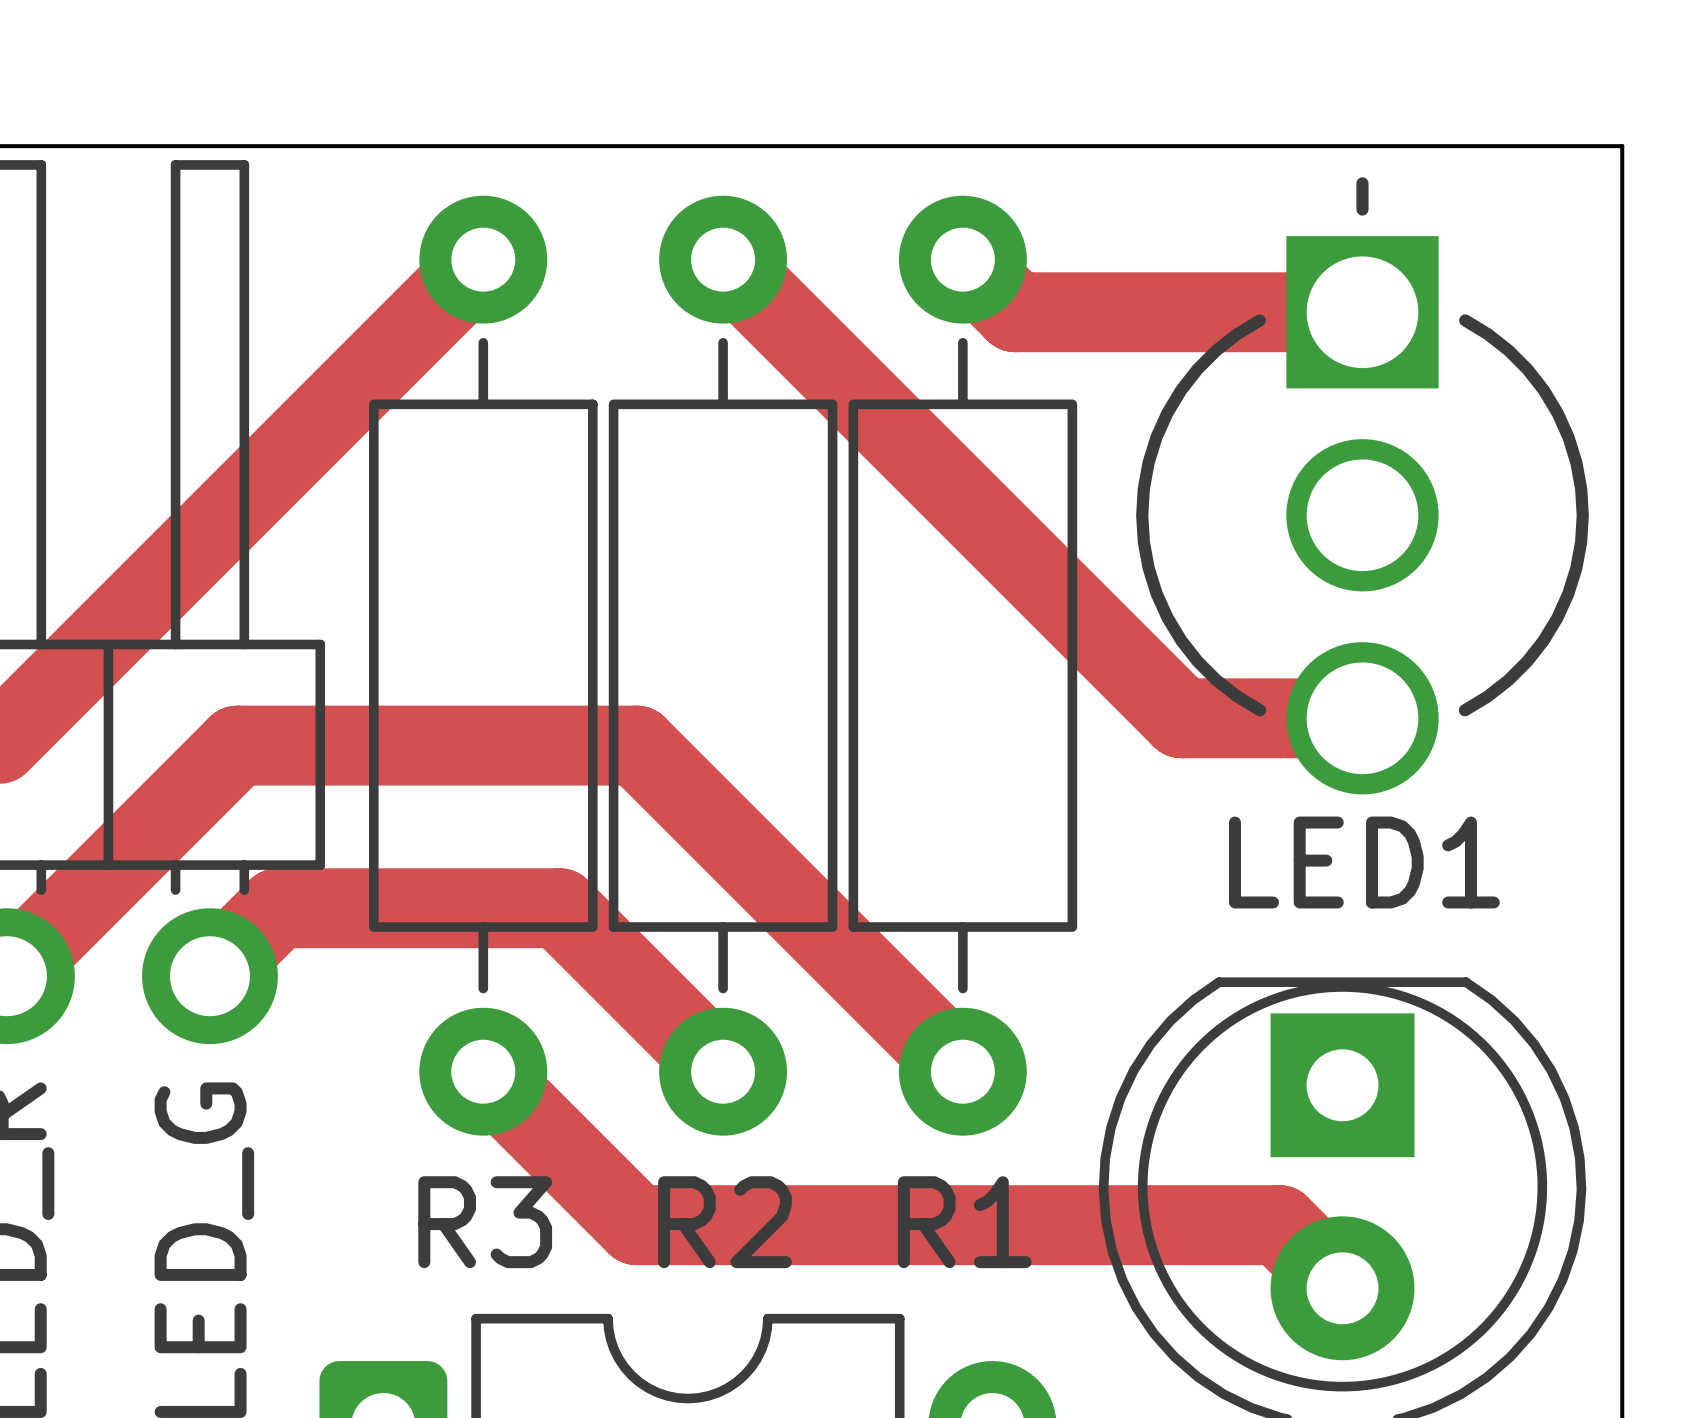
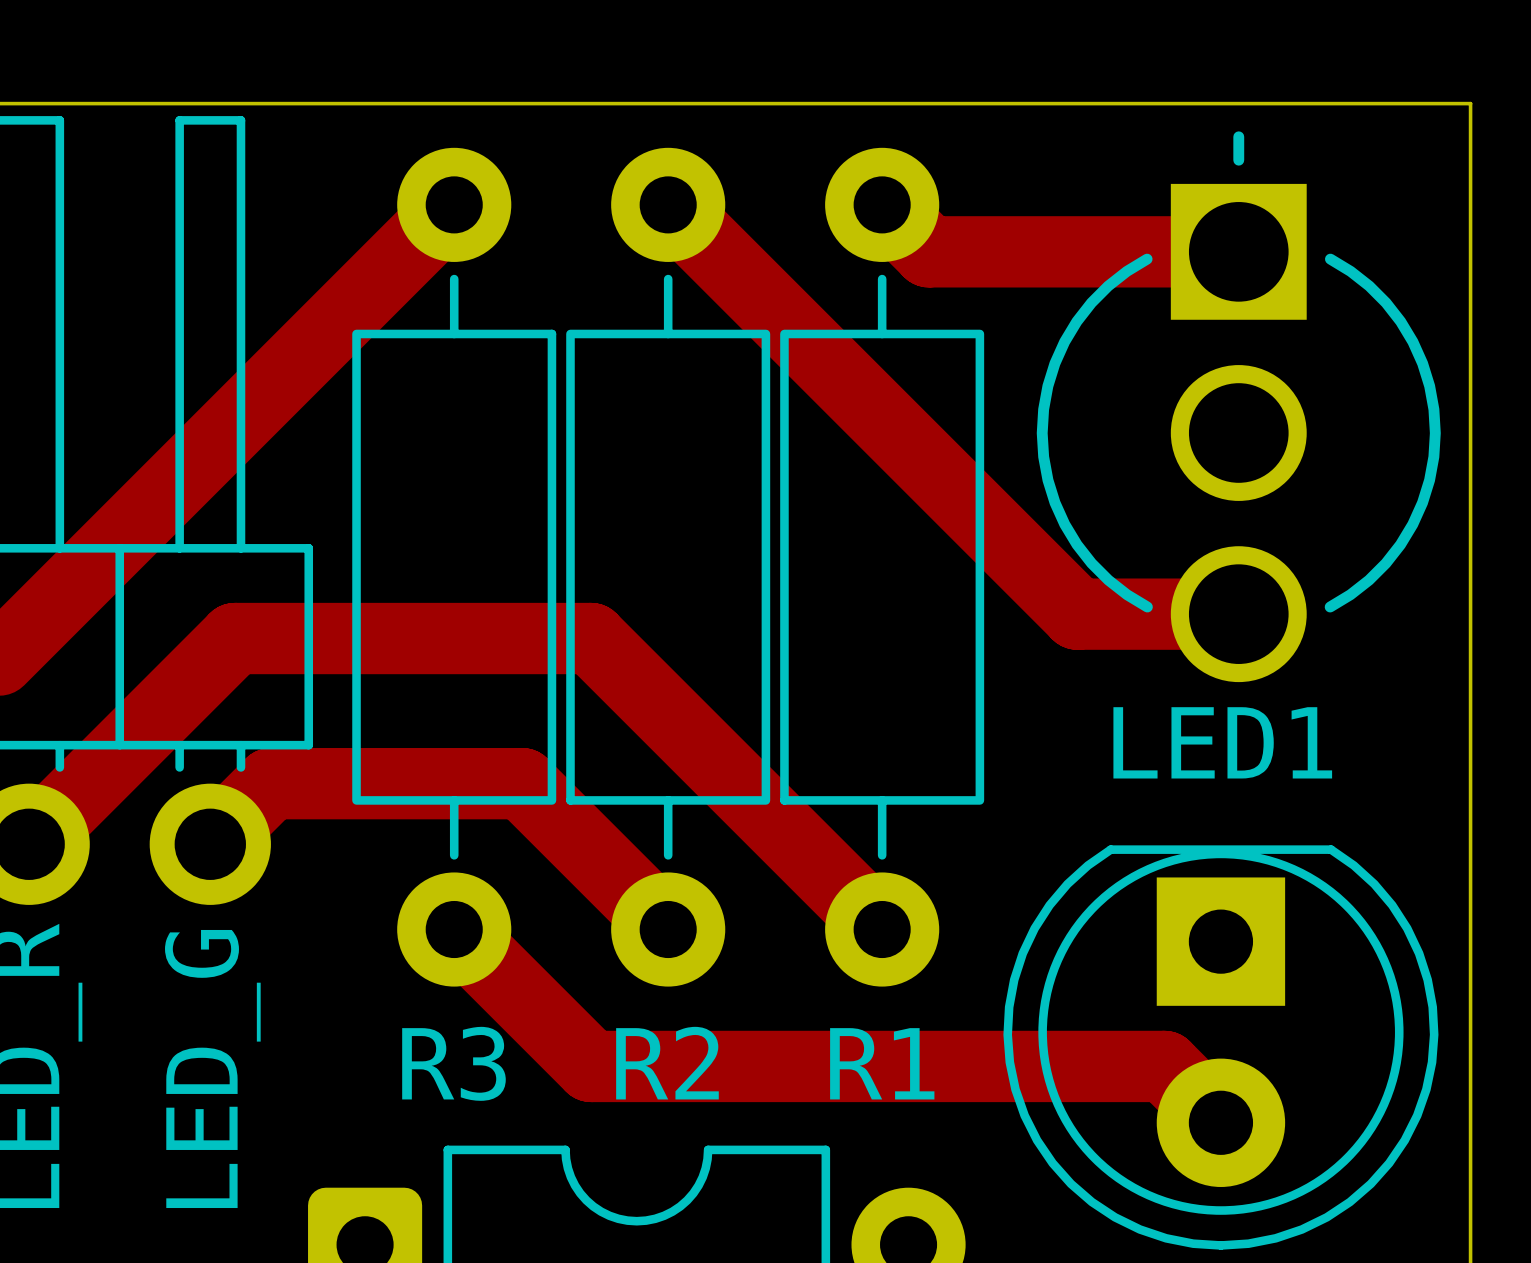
LED1 name position: LED1 (1364, 862) -> LED1 (1222, 742)

